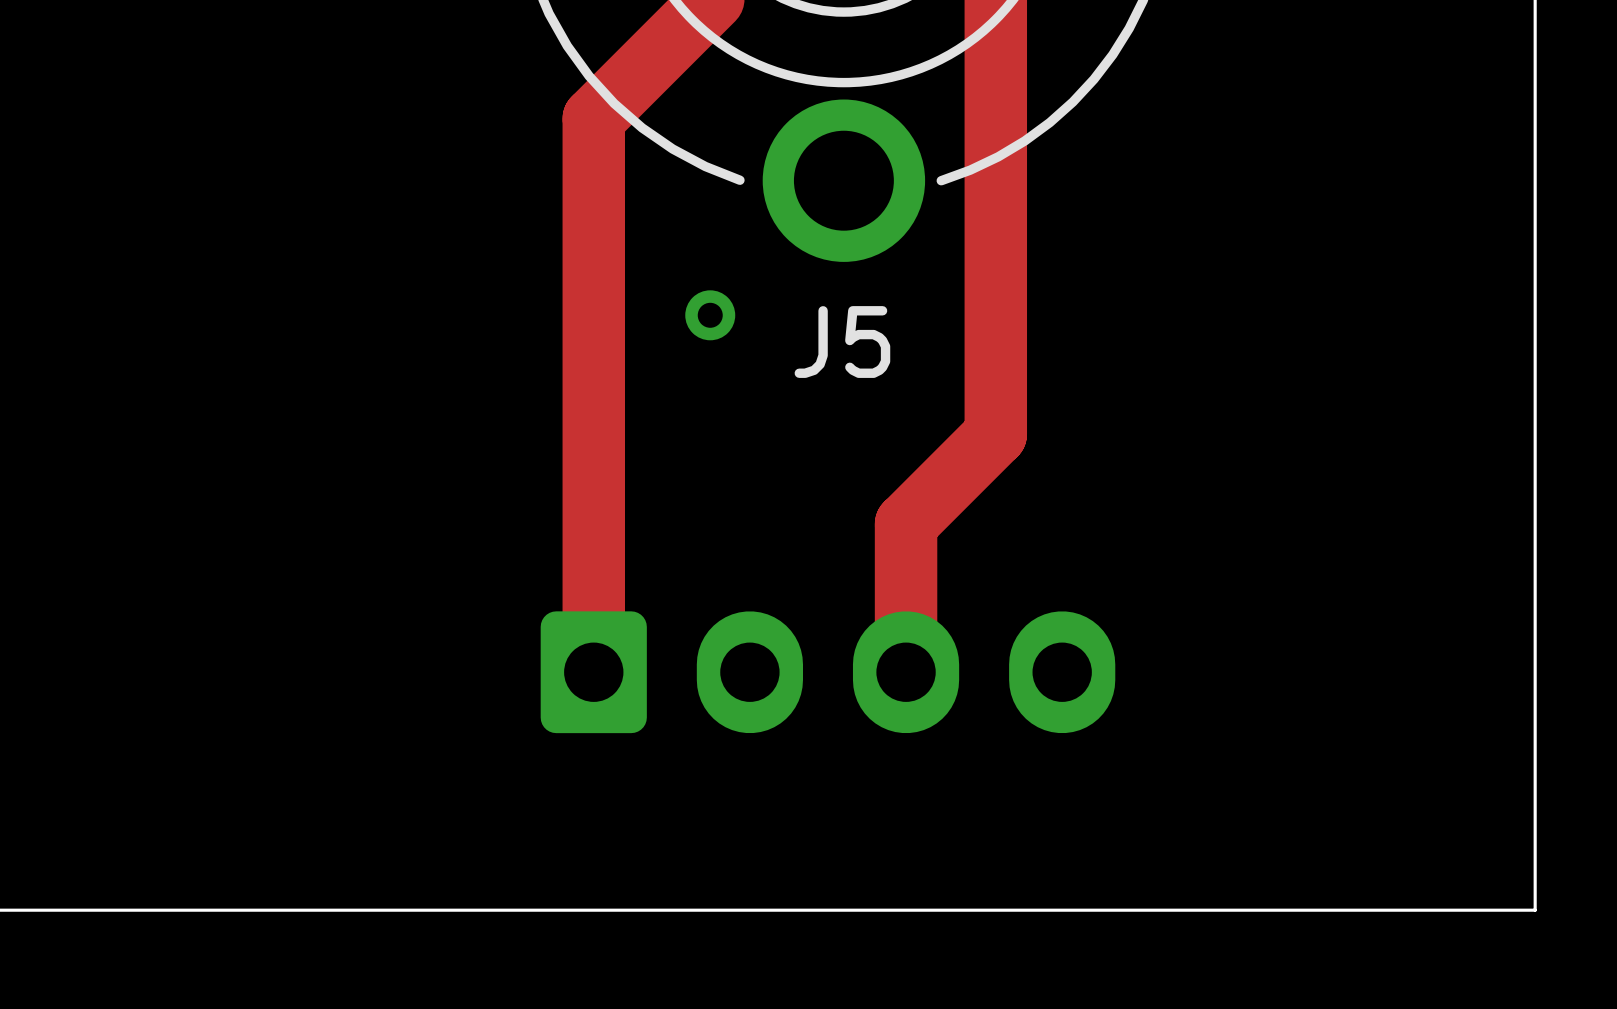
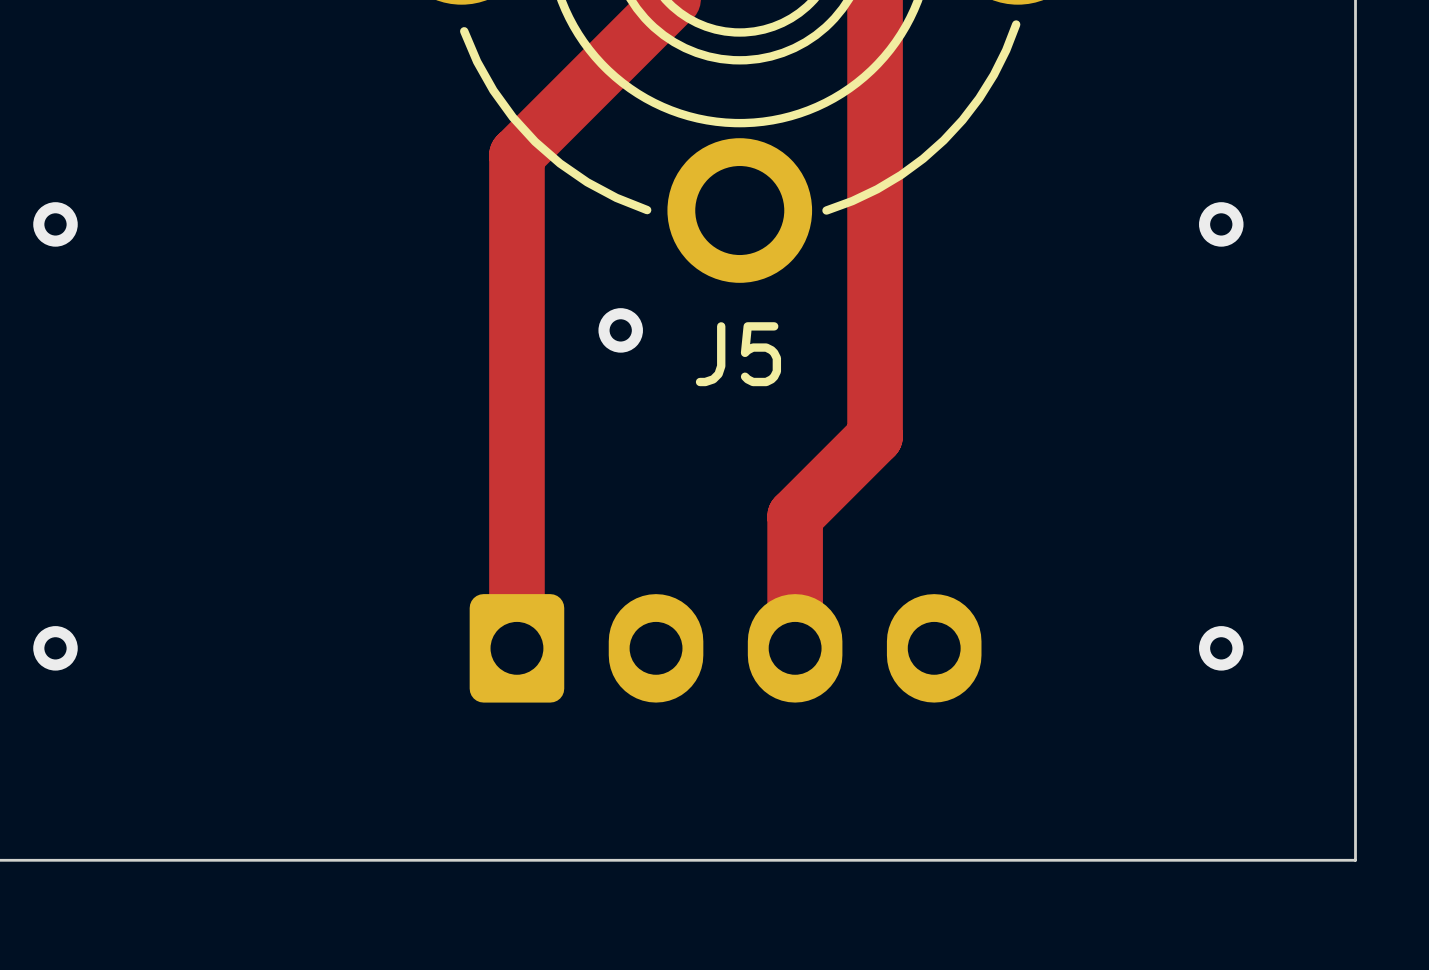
via: none -> (55, 224)
via: none -> (1221, 224)
via: none -> (55, 648)
via: none -> (1221, 648)

